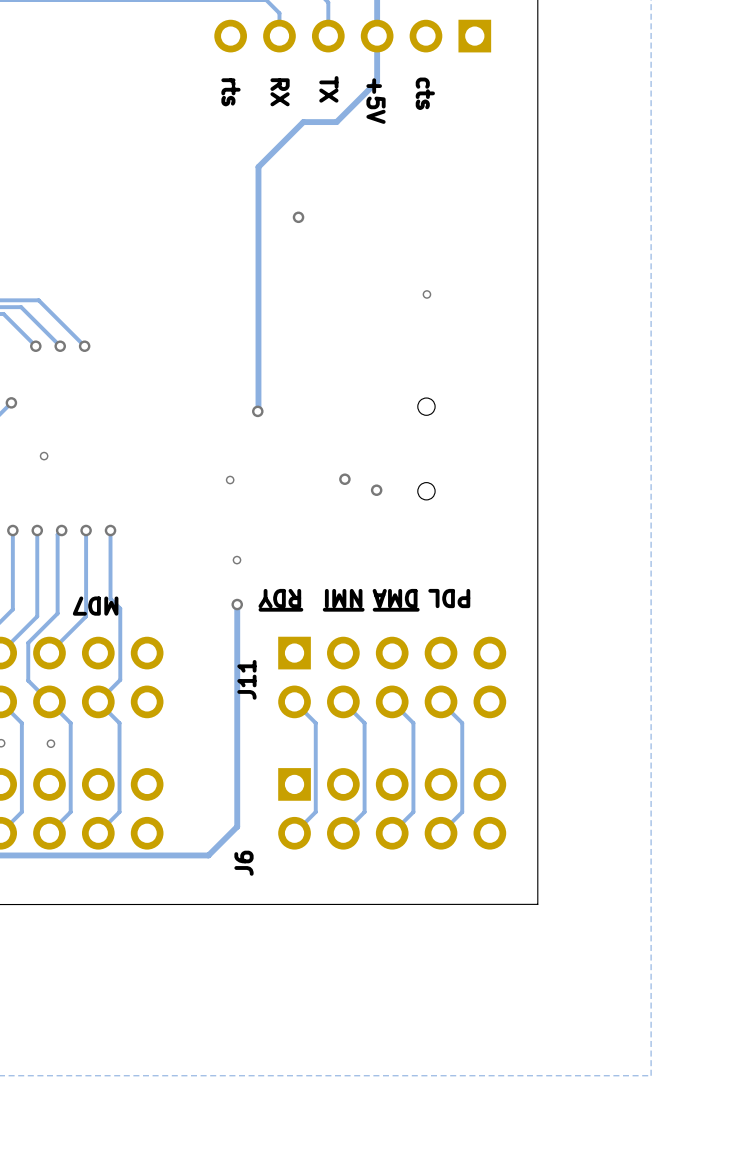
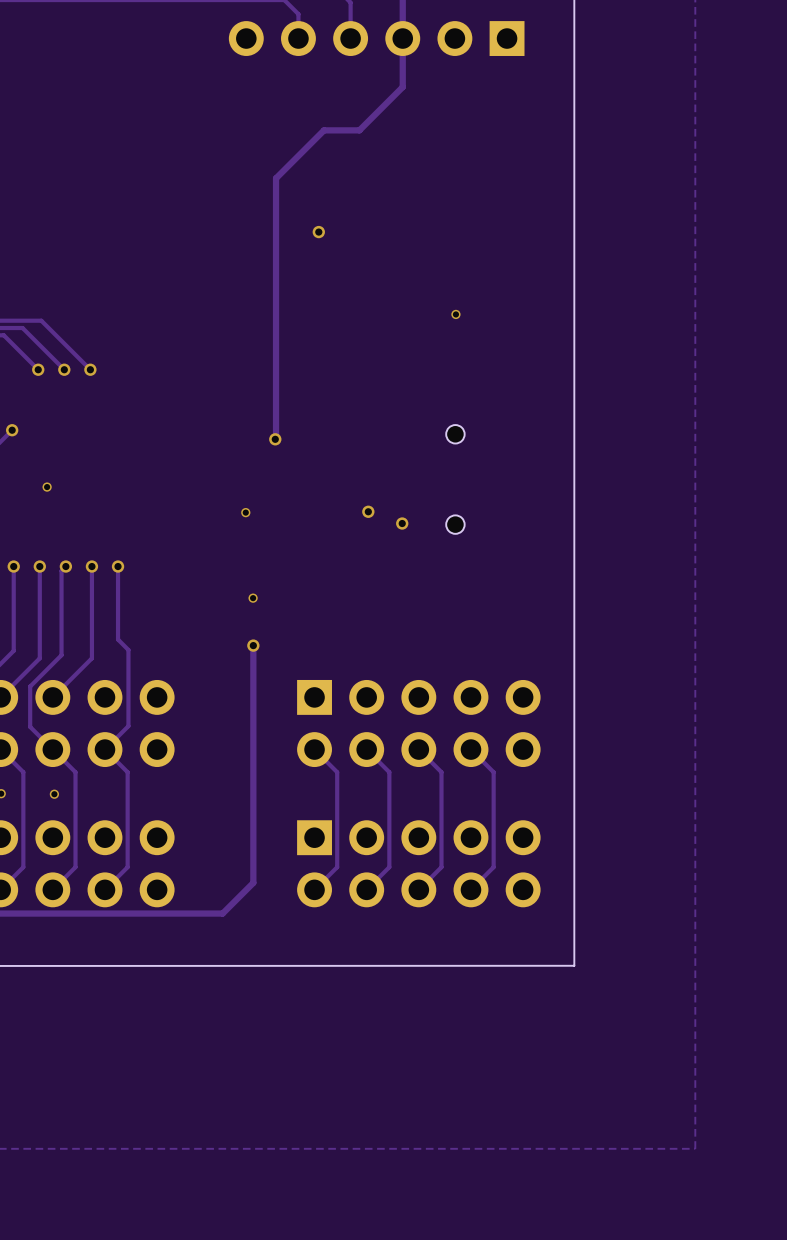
text: TX (328, 89) -> none
text: rts (230, 92) -> none
text: RX (280, 92) -> none
text: cts (425, 93) -> none
text: +5V (376, 101) -> none
text: PDL (449, 598) -> none
text: ~{RDY} (280, 600) -> none
text: ~{NMI} (343, 600) -> none
text: ~{DMA} (396, 600) -> none
text: MD7 (95, 606) -> none
text: J11 (246, 679) -> none
text: J6 (243, 863) -> none

